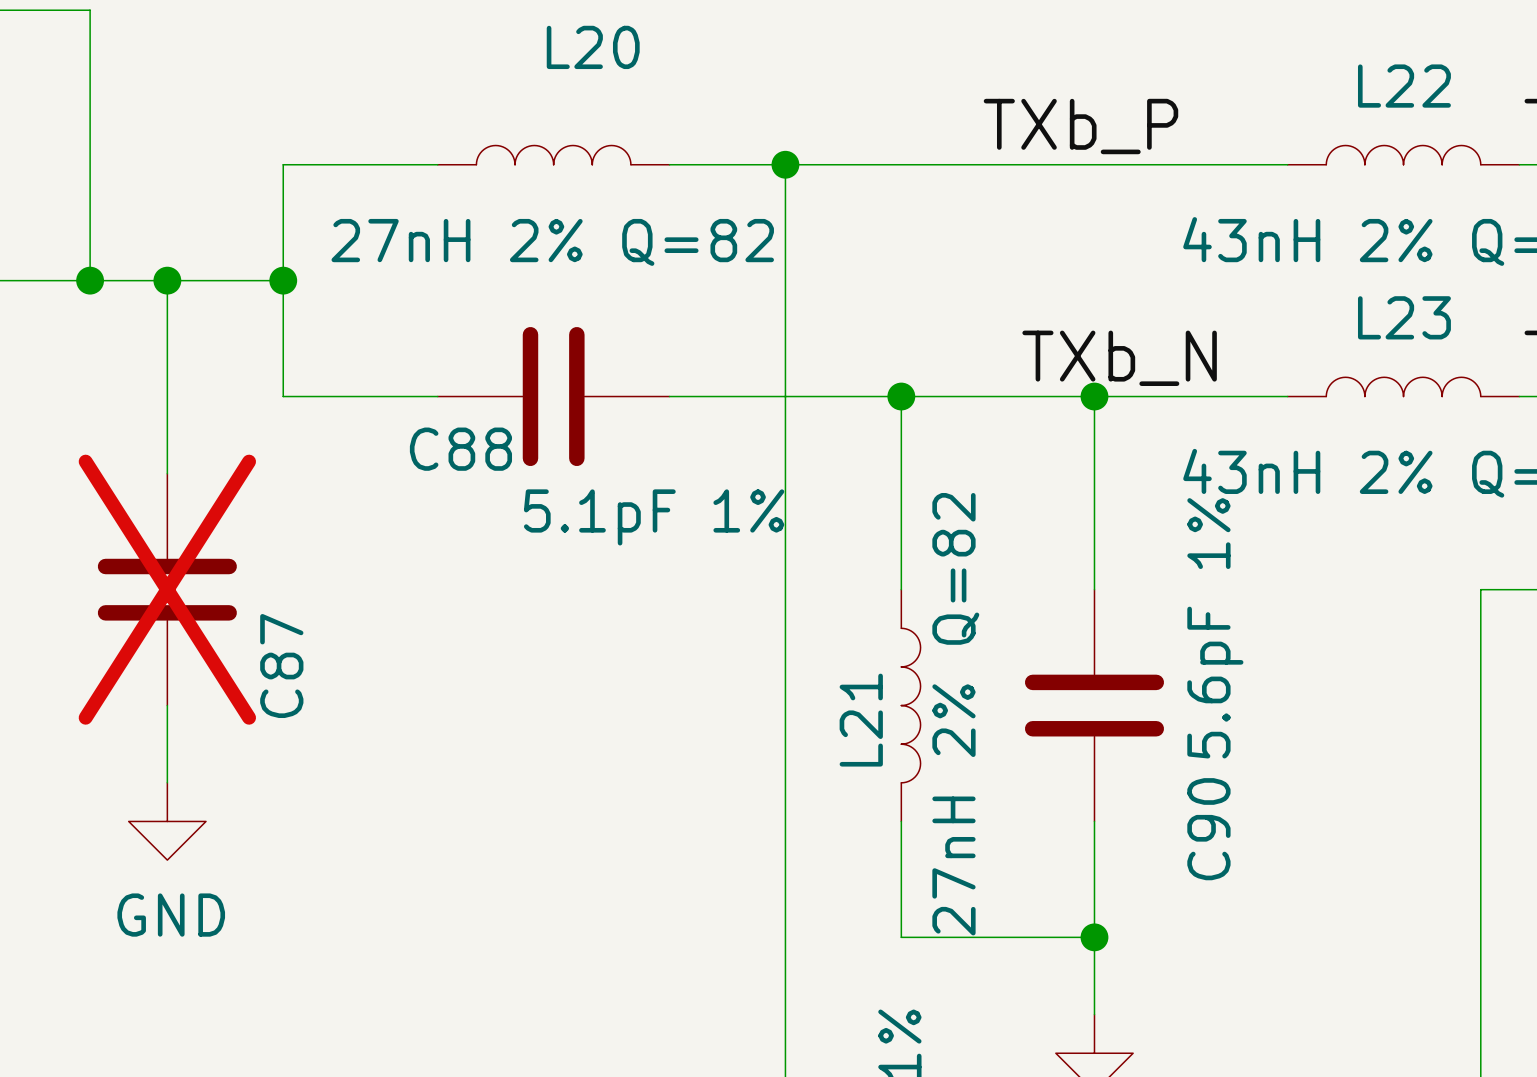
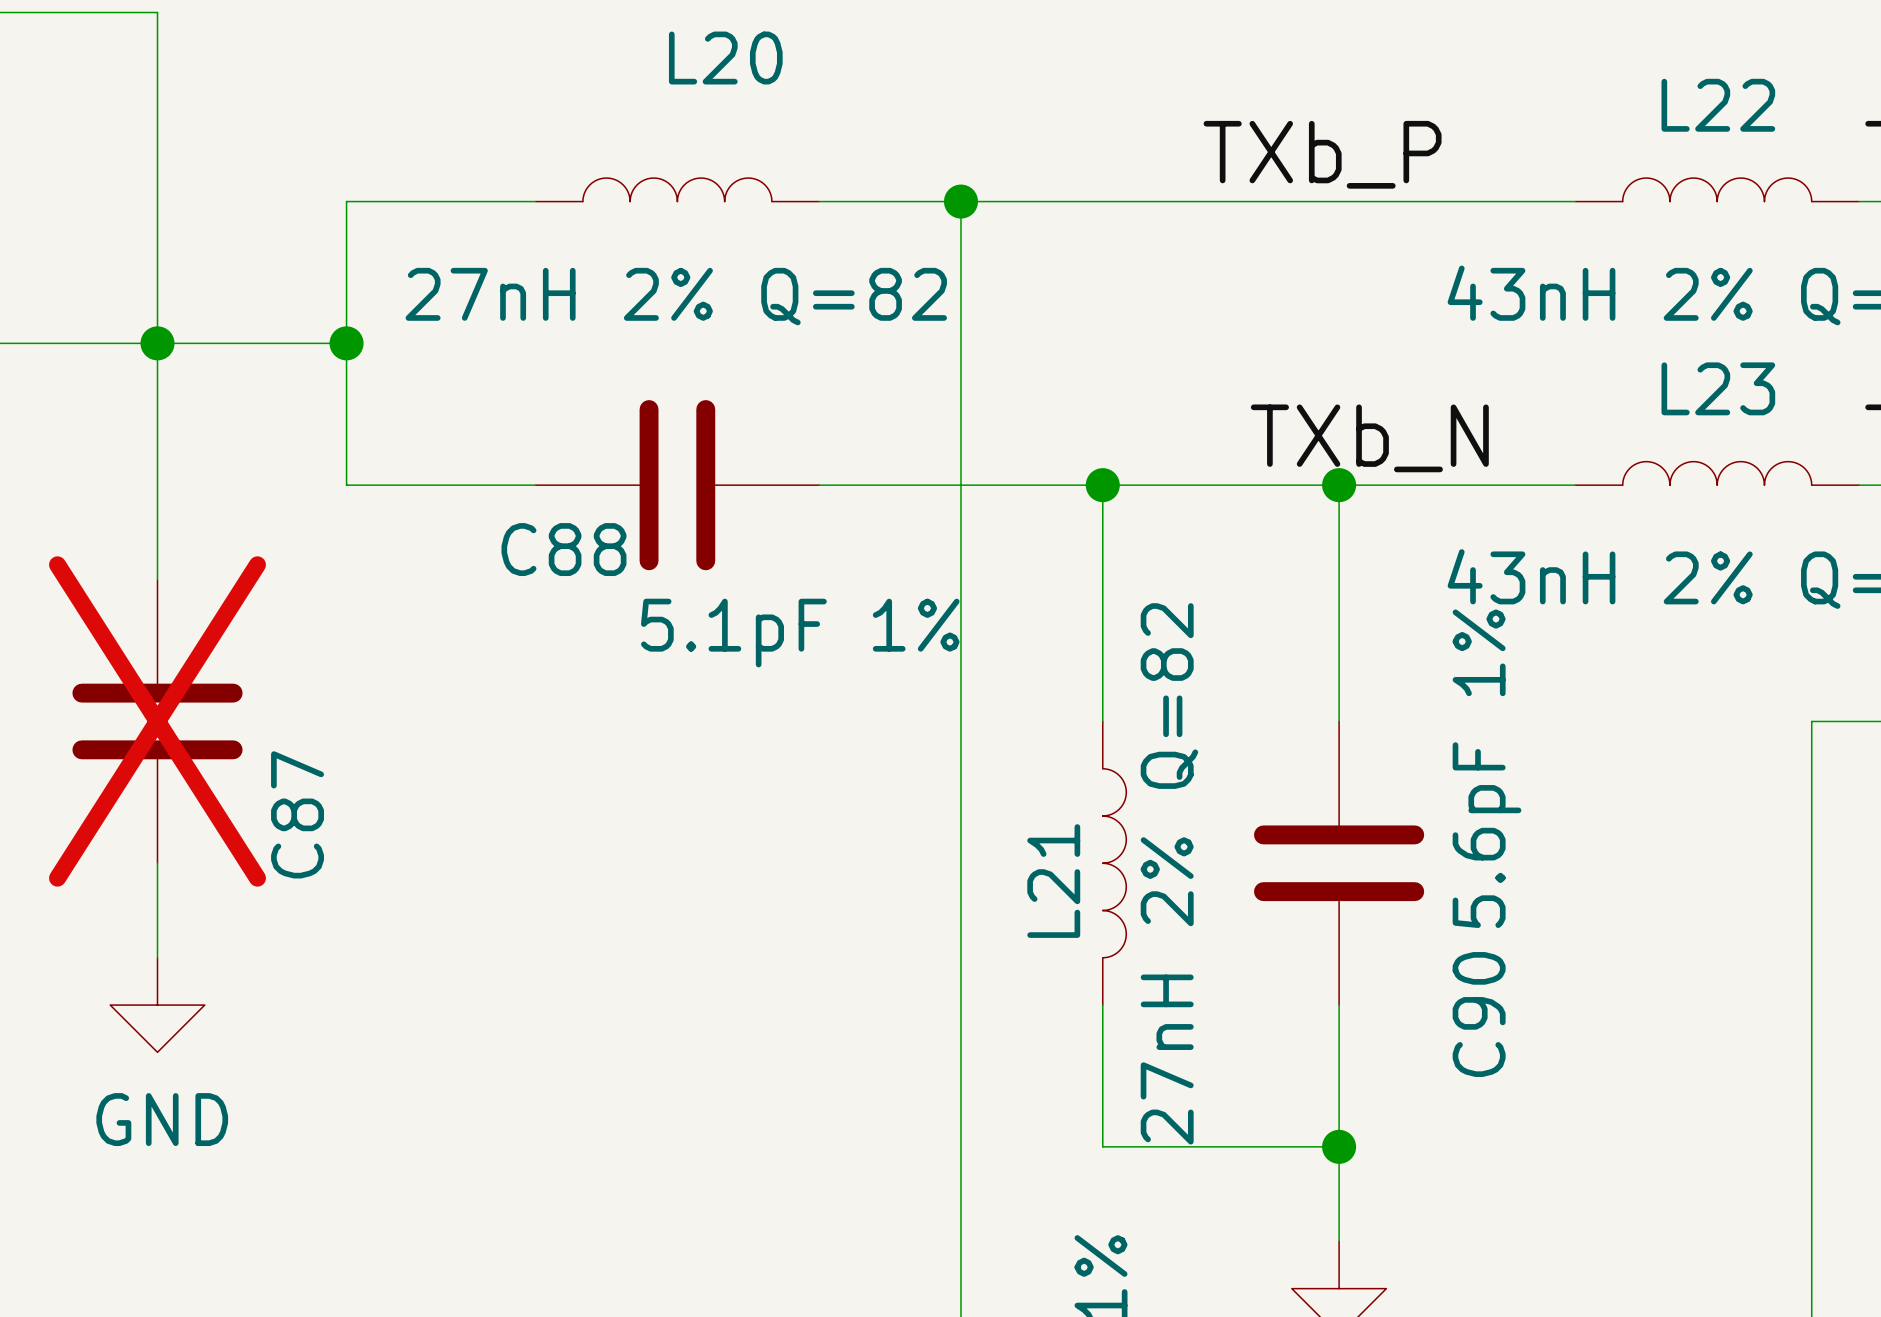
wire: (90, 10) (90, 280) -> (110, 12) (157, 12) (157, 579)
junction: (90, 280) -> none
junction: none -> (157, 343)
wire: (167, 280) (167, 473) -> none
junction: (167, 280) -> none
C87 position: (167, 589) -> (157, 721)
wire: (167, 705) (167, 782) -> (157, 863) (157, 957)
power symbol position: GND (167, 821) -> GND (157, 1005)

